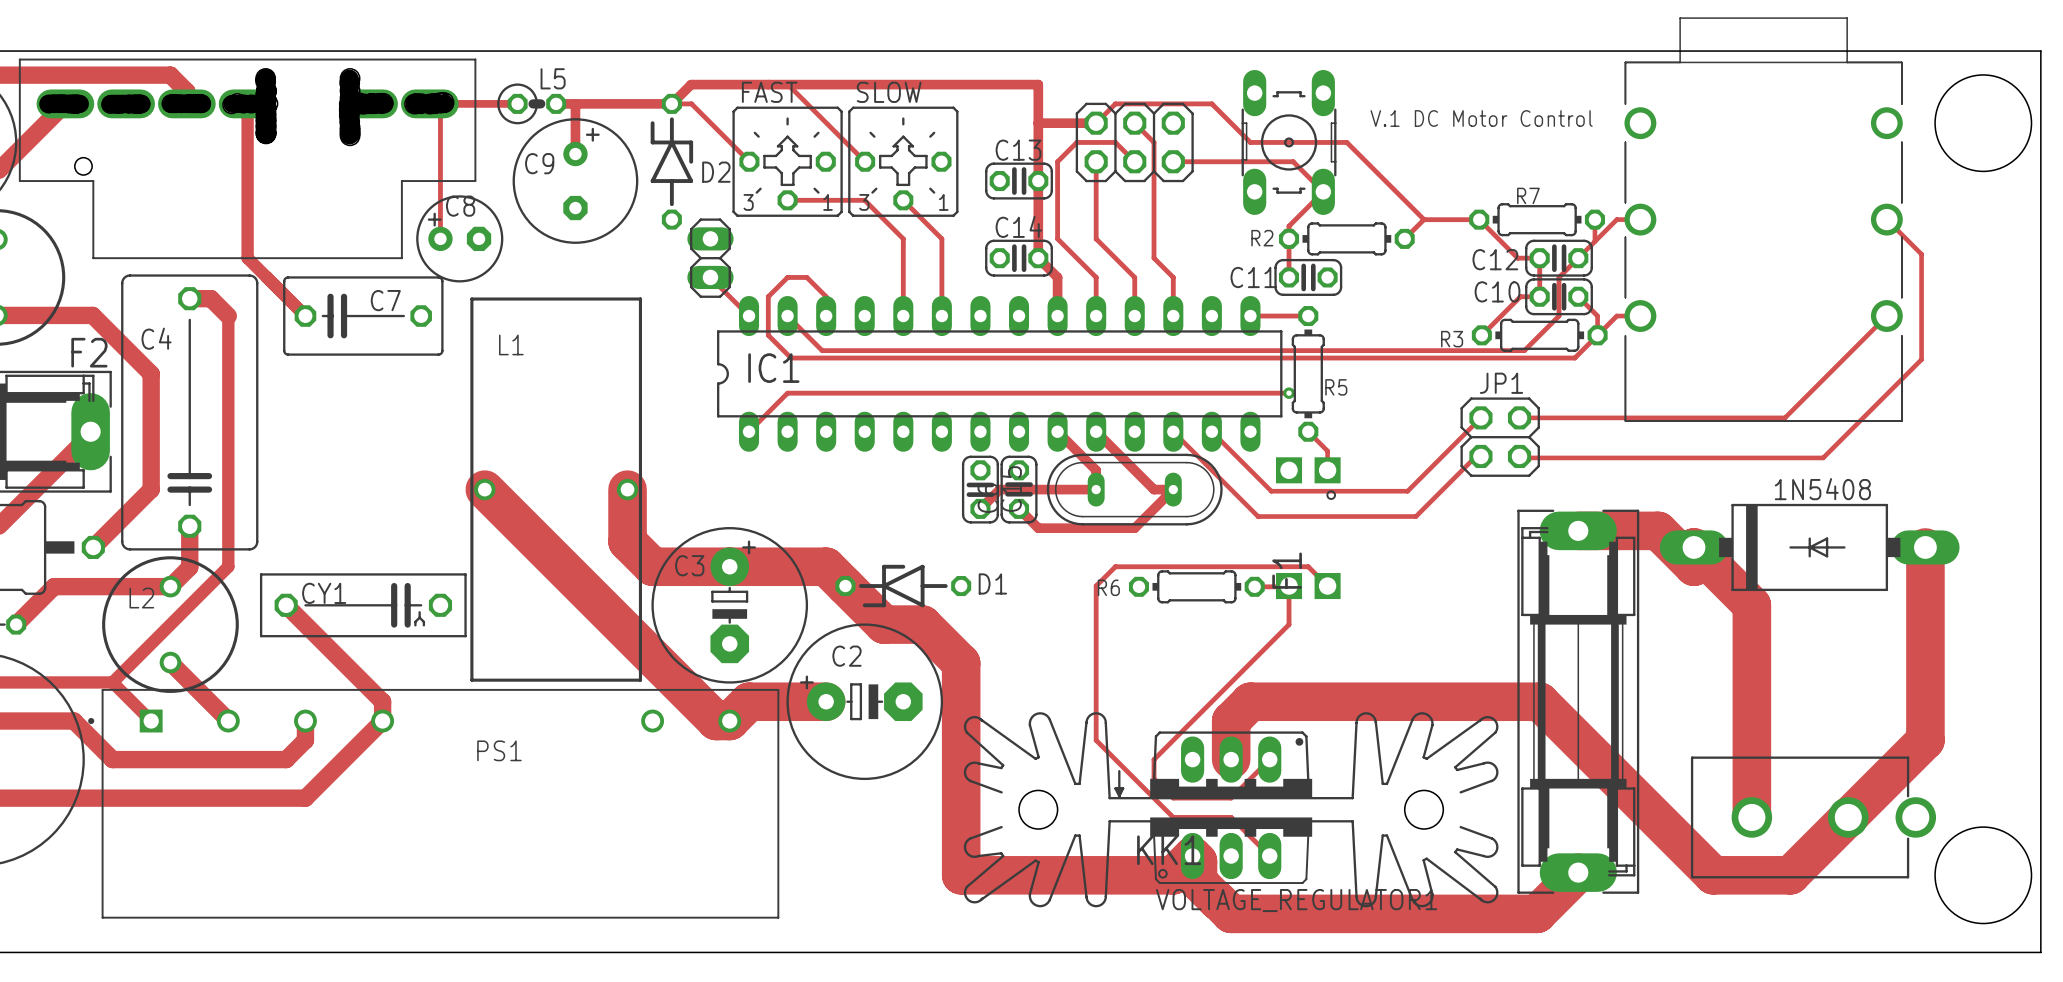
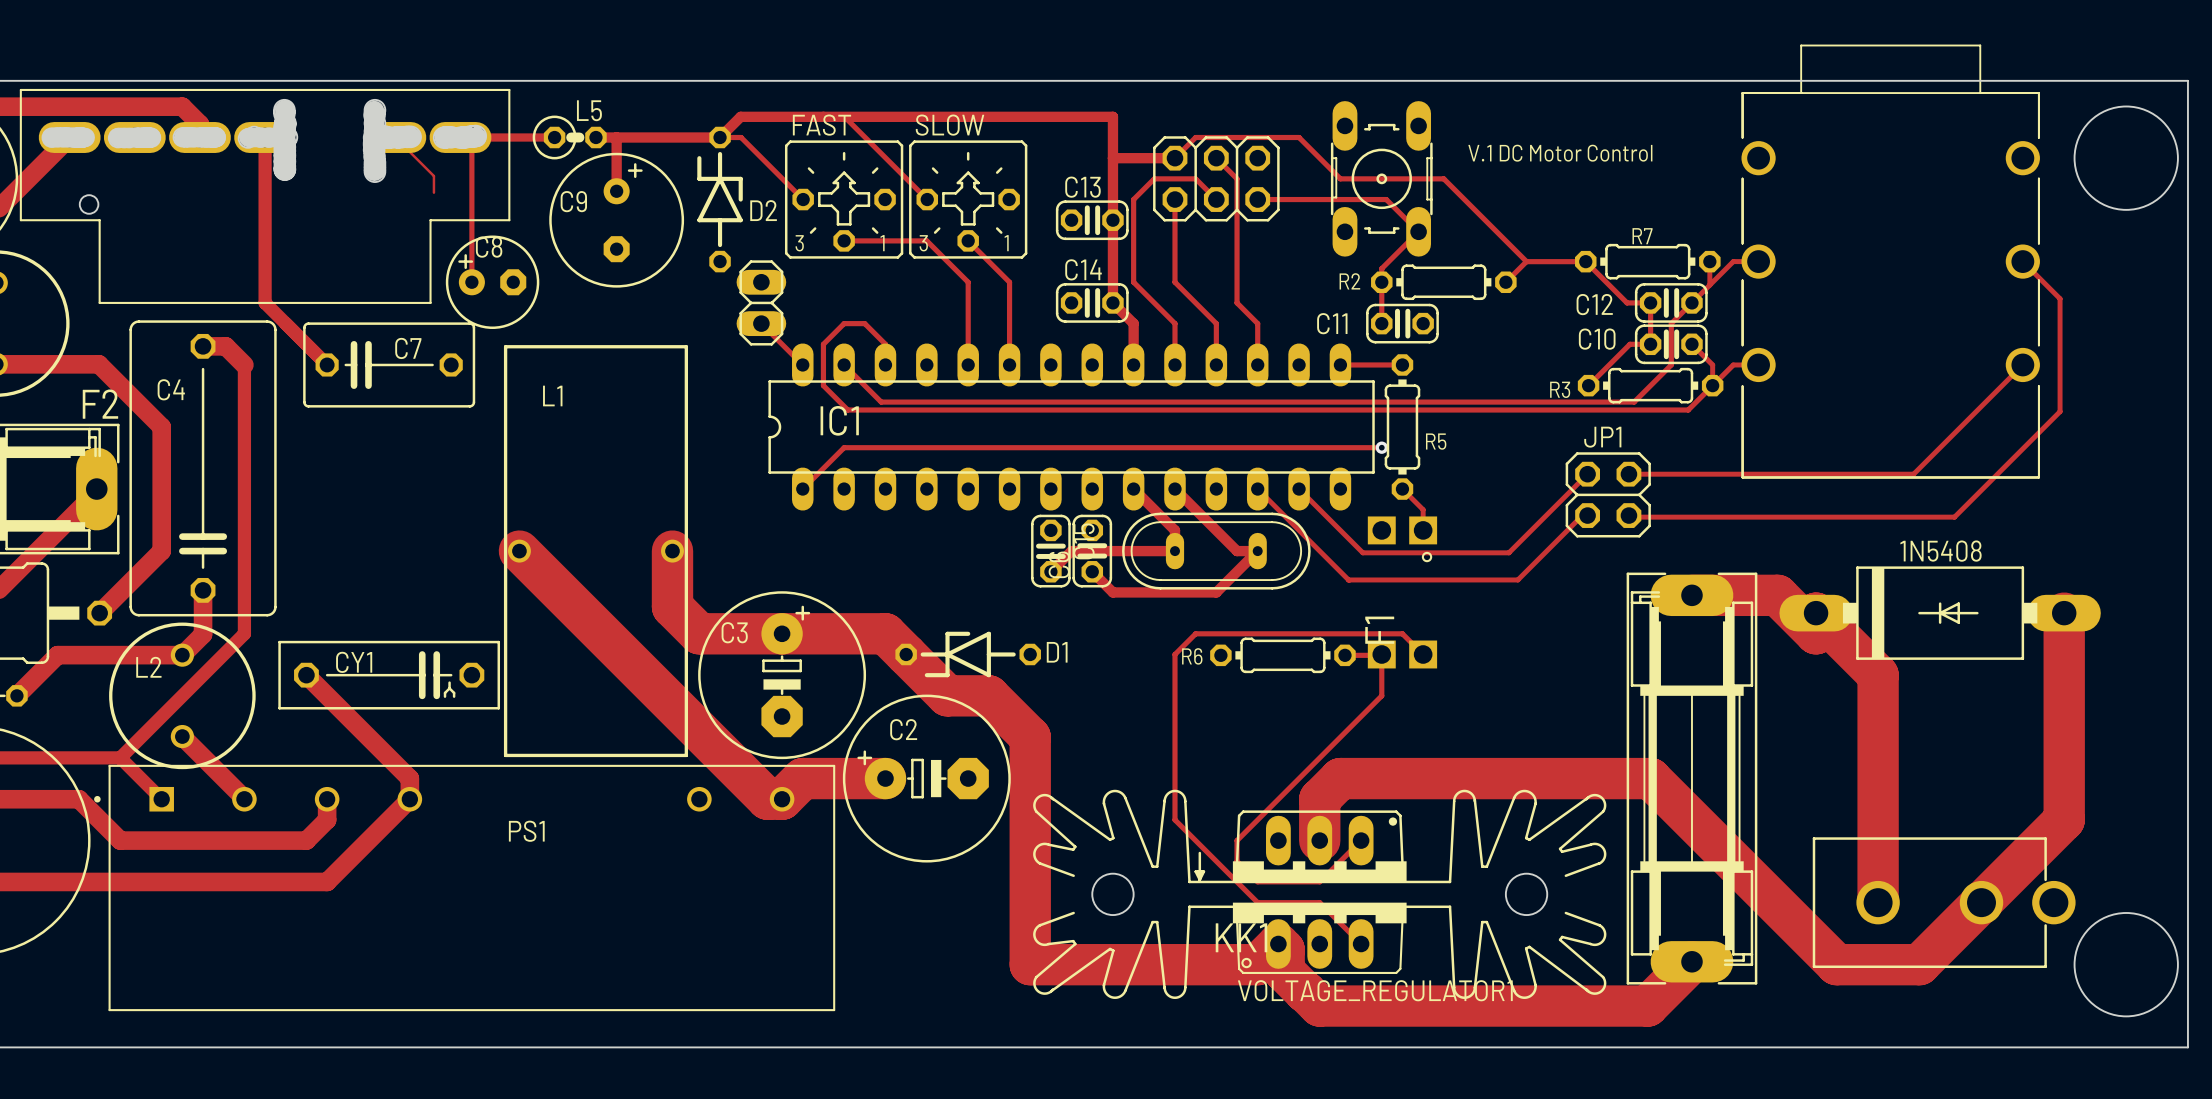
track: none -> (395, 137) (433, 176) (433, 192)

